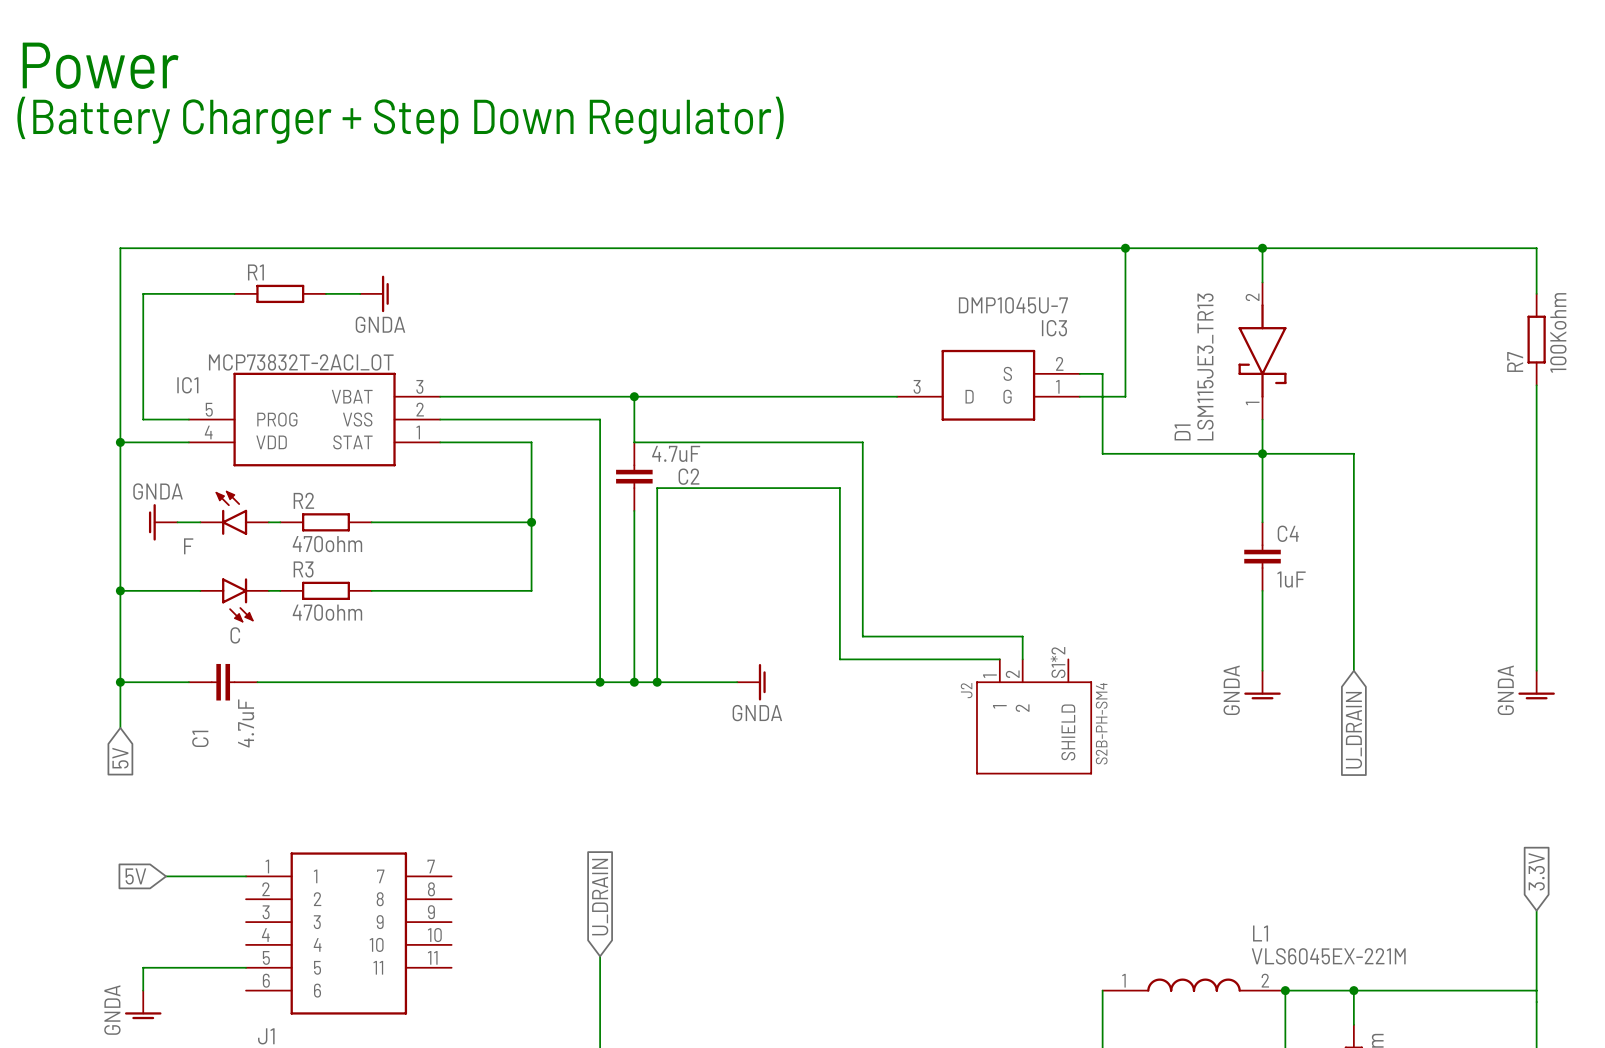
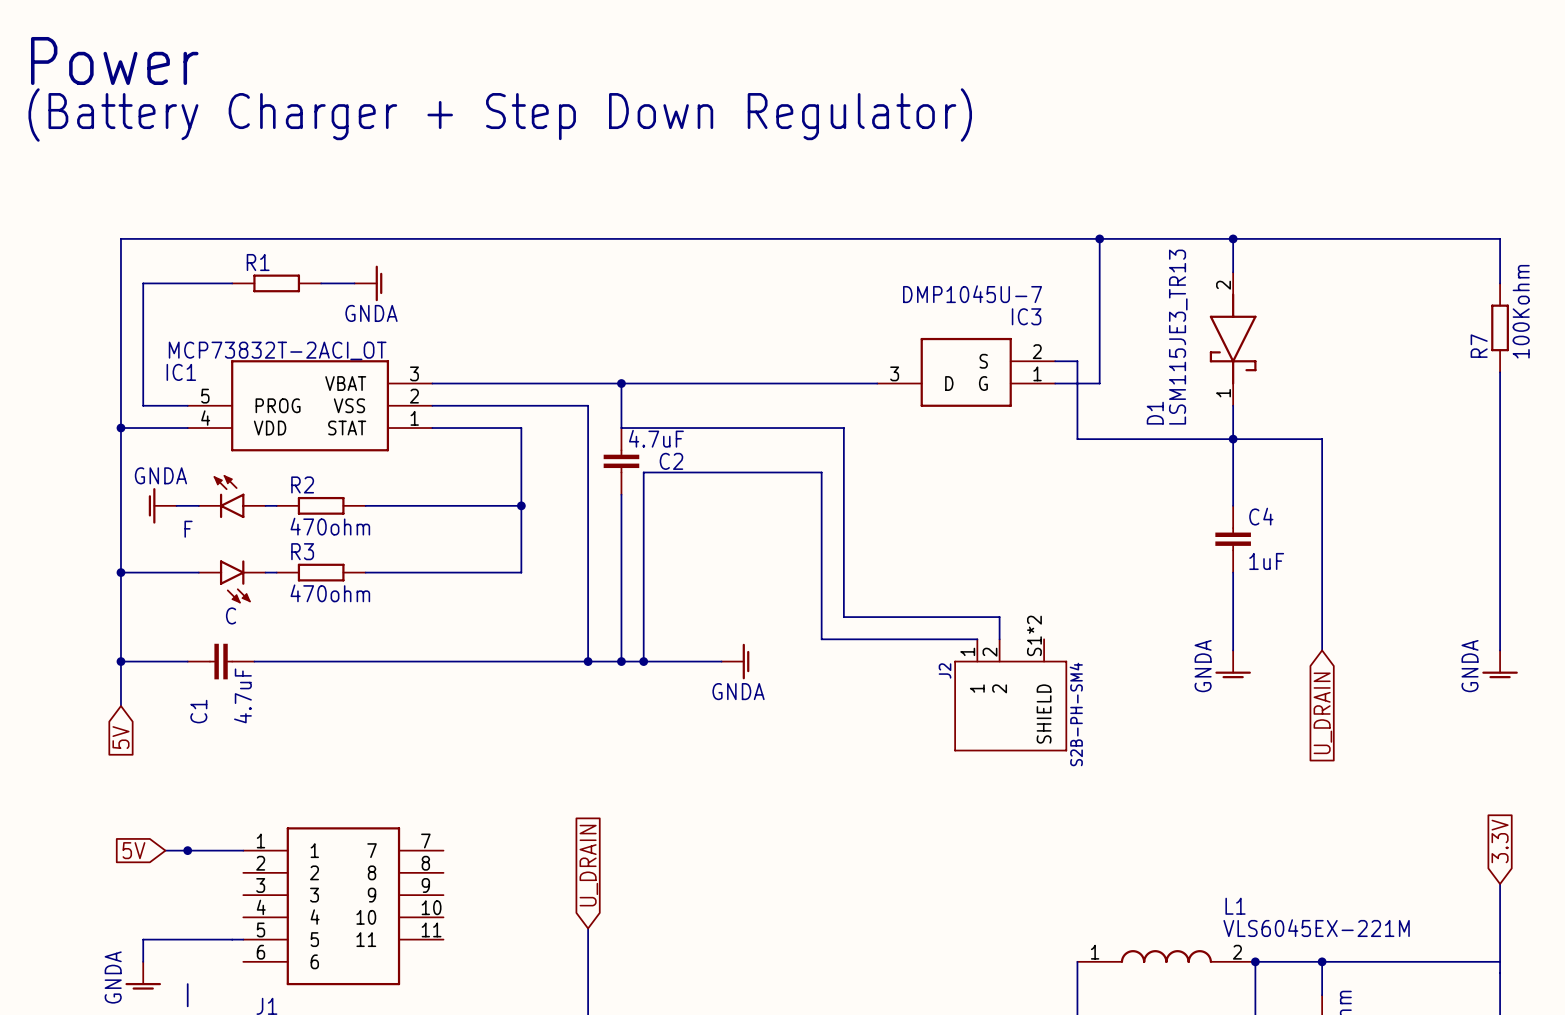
junction: none -> (187, 850)
wire: none -> (187, 984) (187, 1006)

